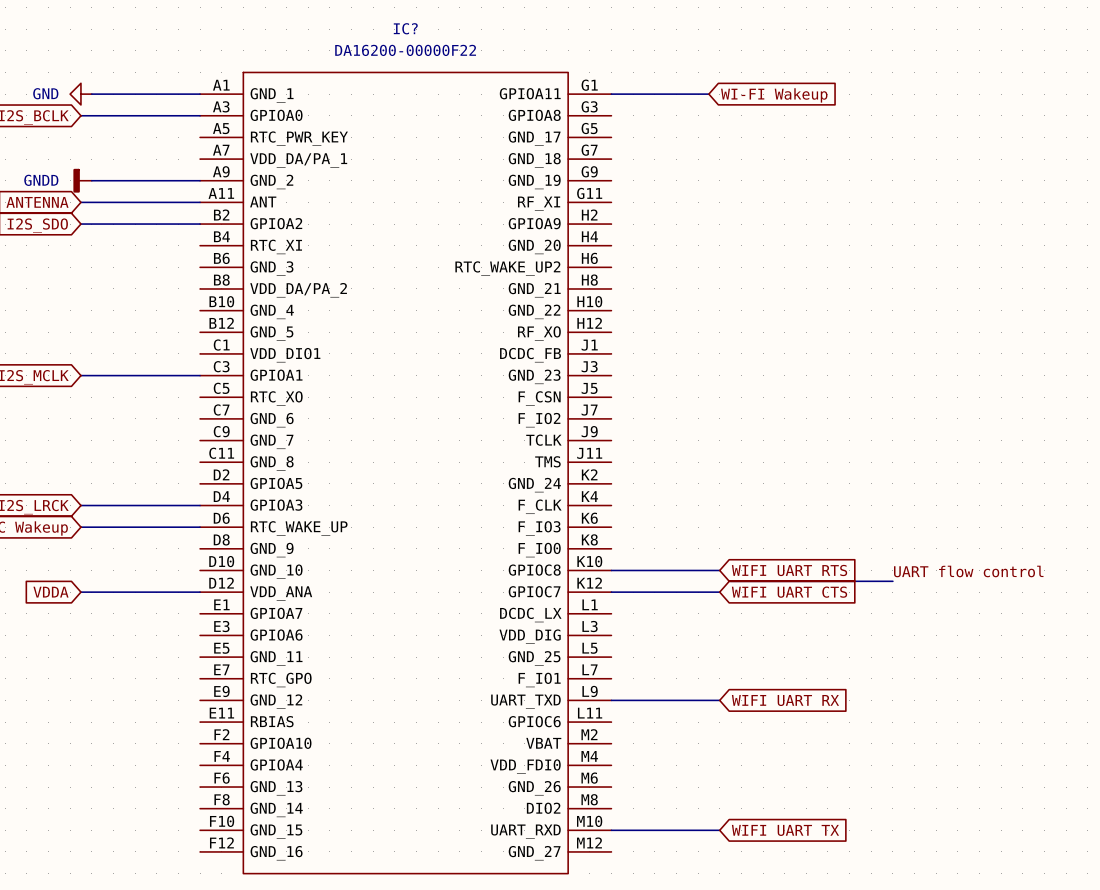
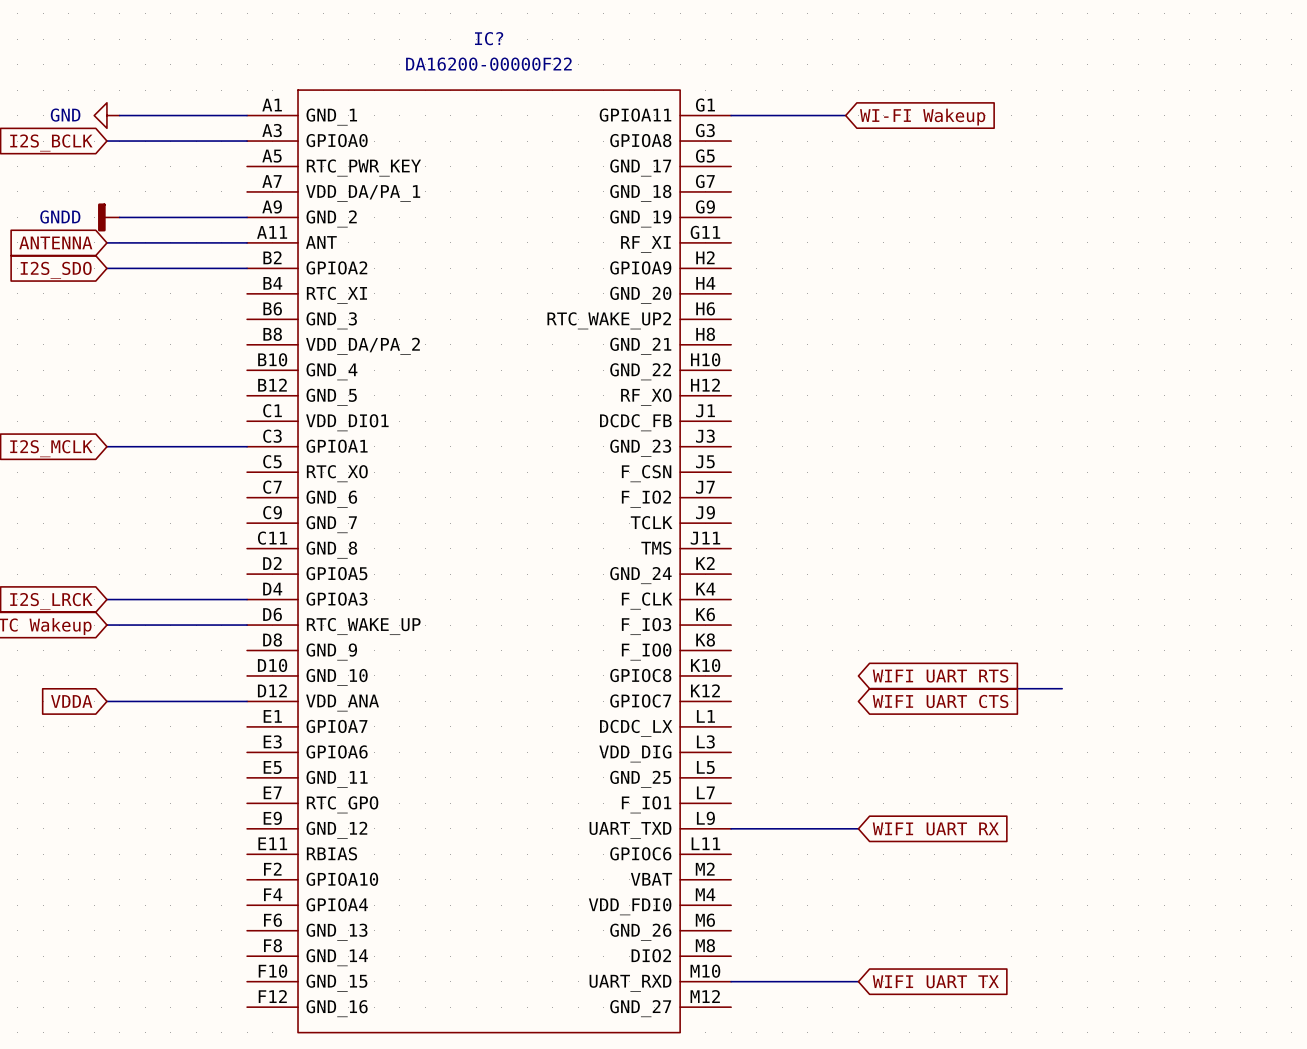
wire: (611, 570) (719, 570) -> none
label: UART flow control (968, 571) -> none
wire: (611, 592) (719, 592) -> none

